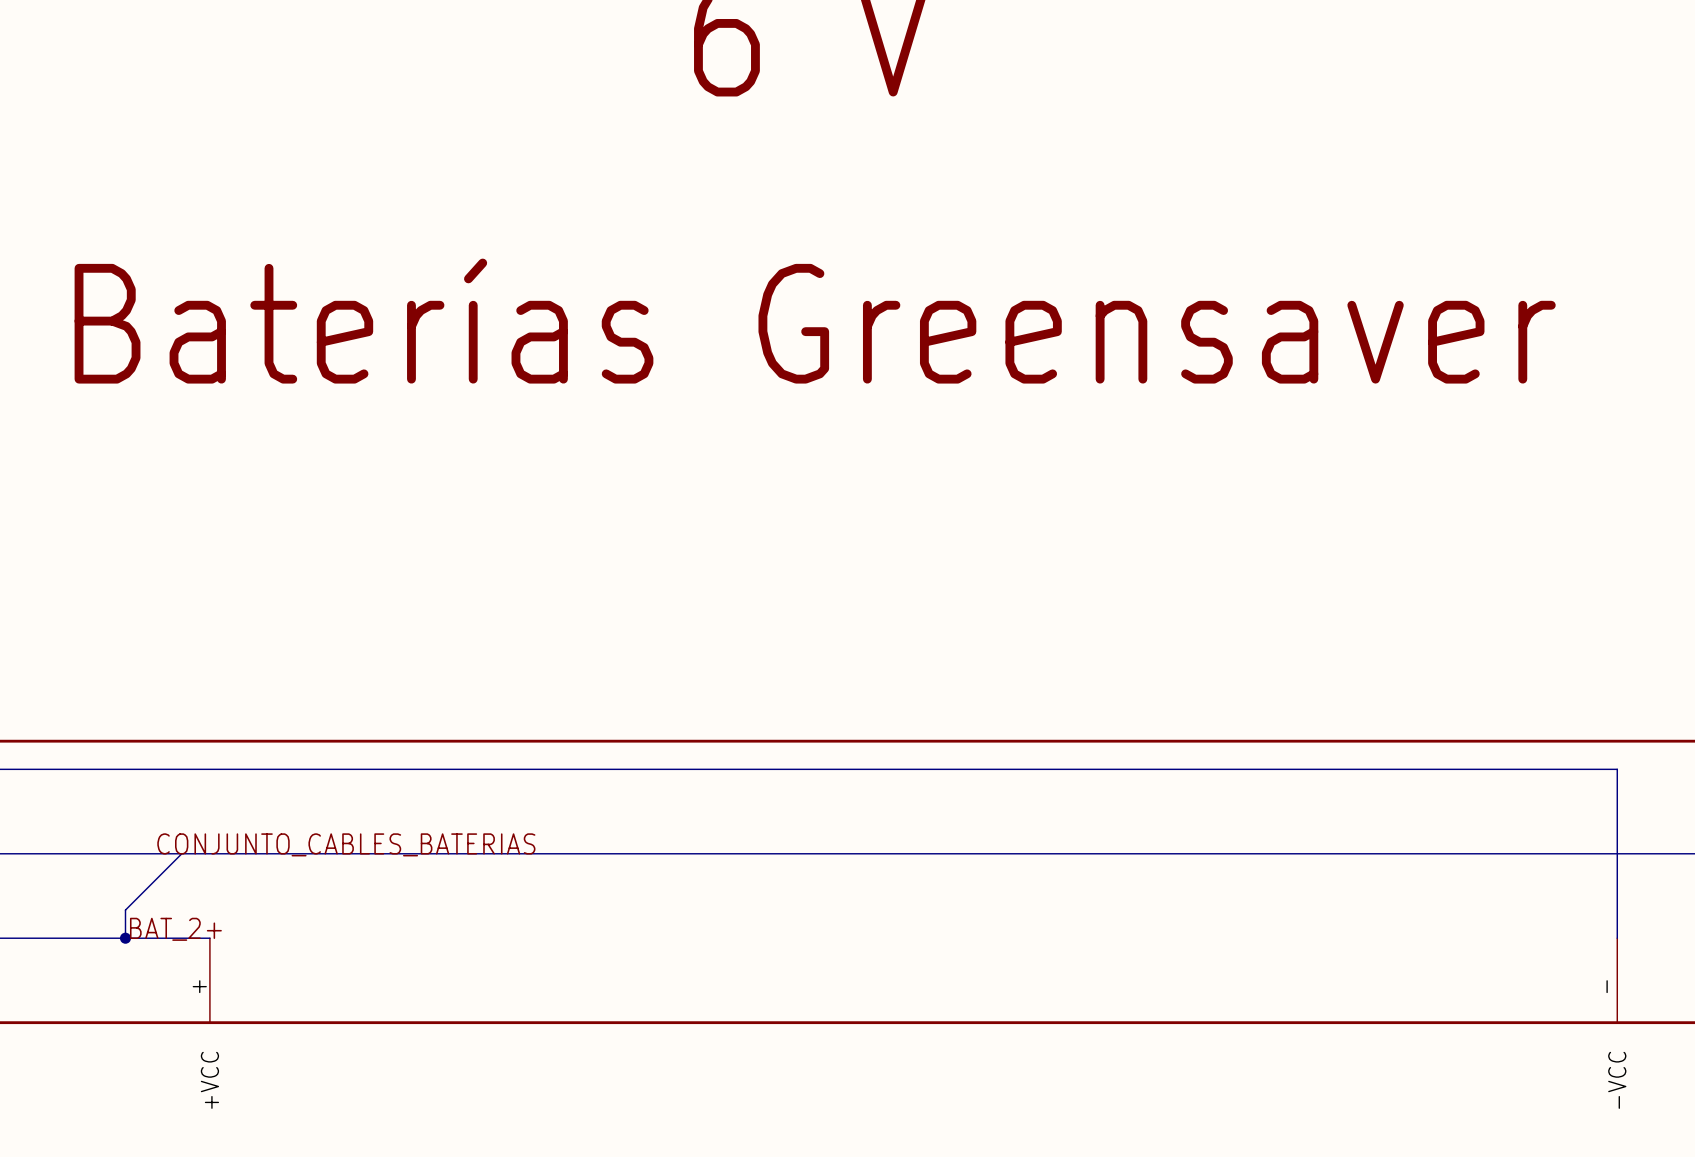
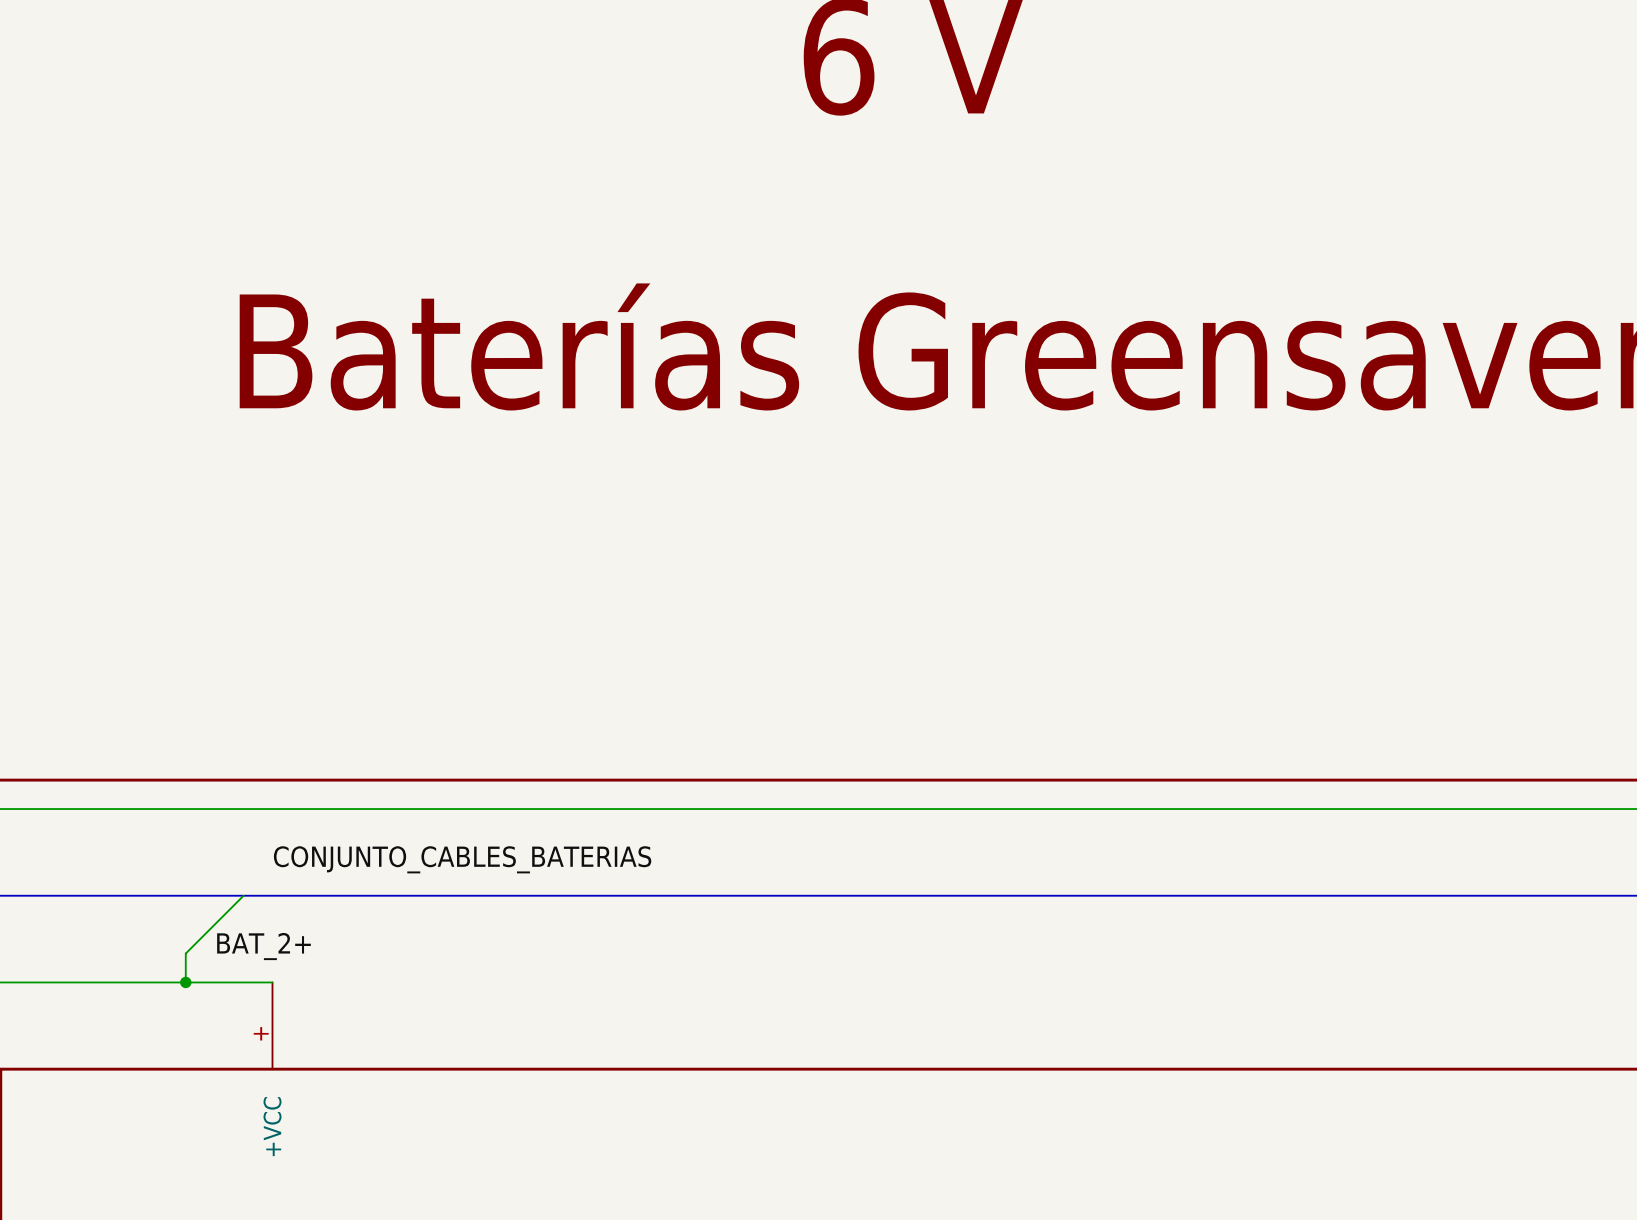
label position: CONJUNTO_CABLES_BATERIAS (346, 844) -> CONJUNTO_CABLES_BATERIAS (462, 859)
label position: BAT_2+ (175, 929) -> BAT_2+ (263, 946)

